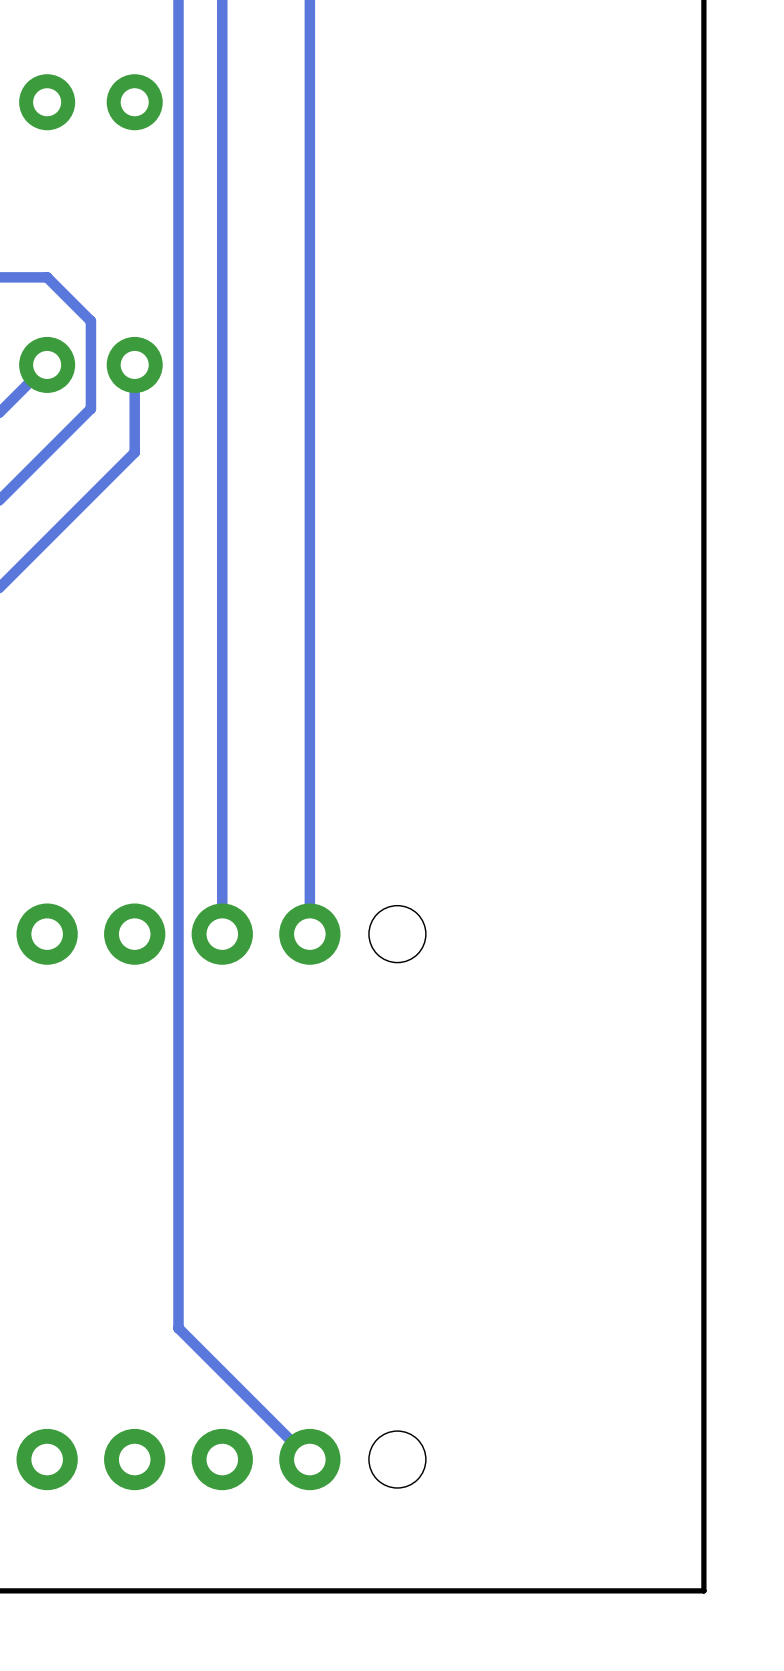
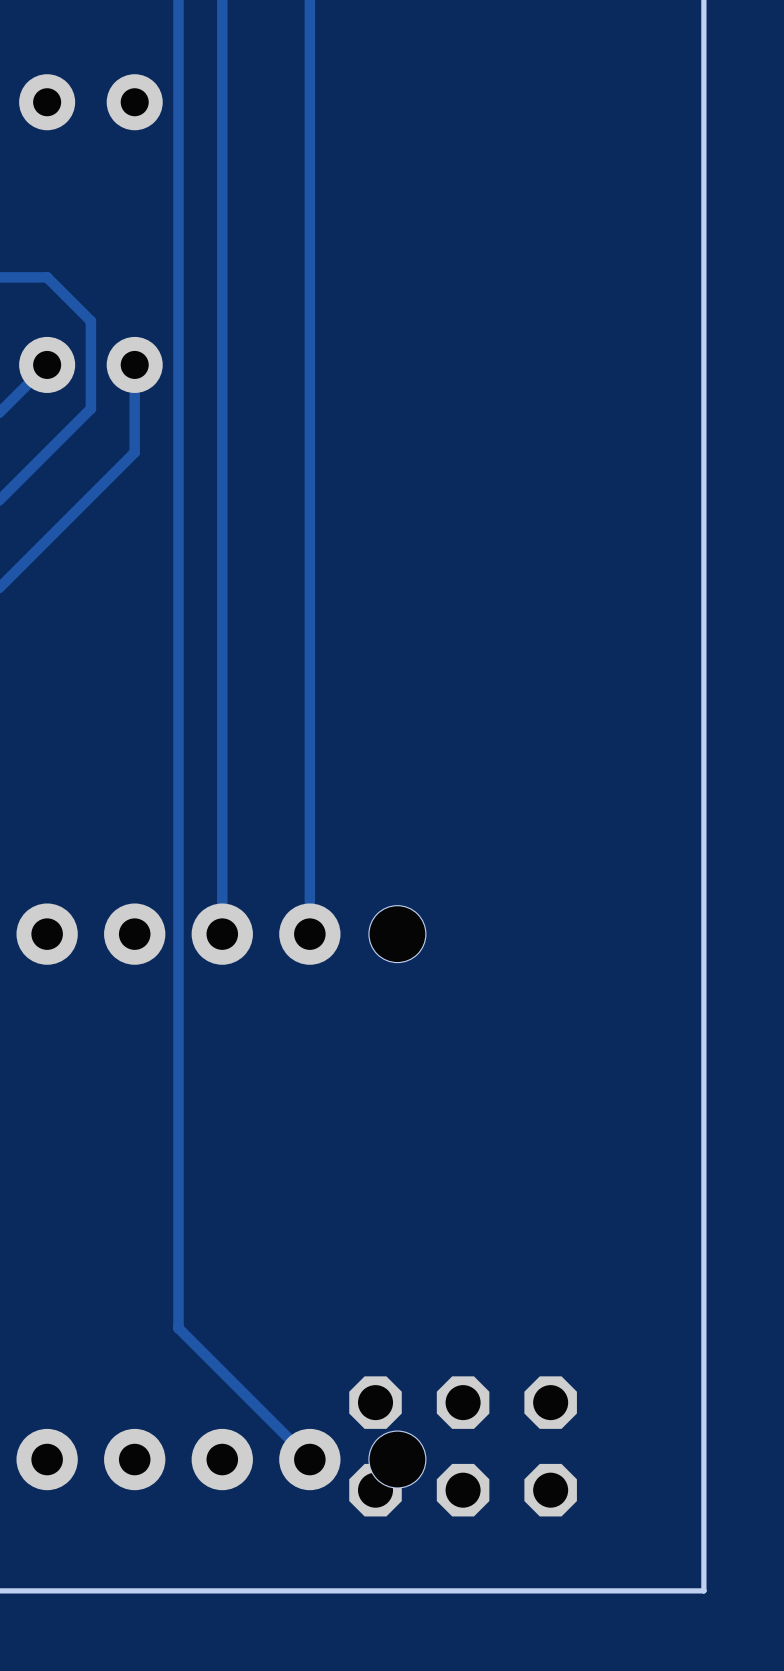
part: none -> (463, 1446)

